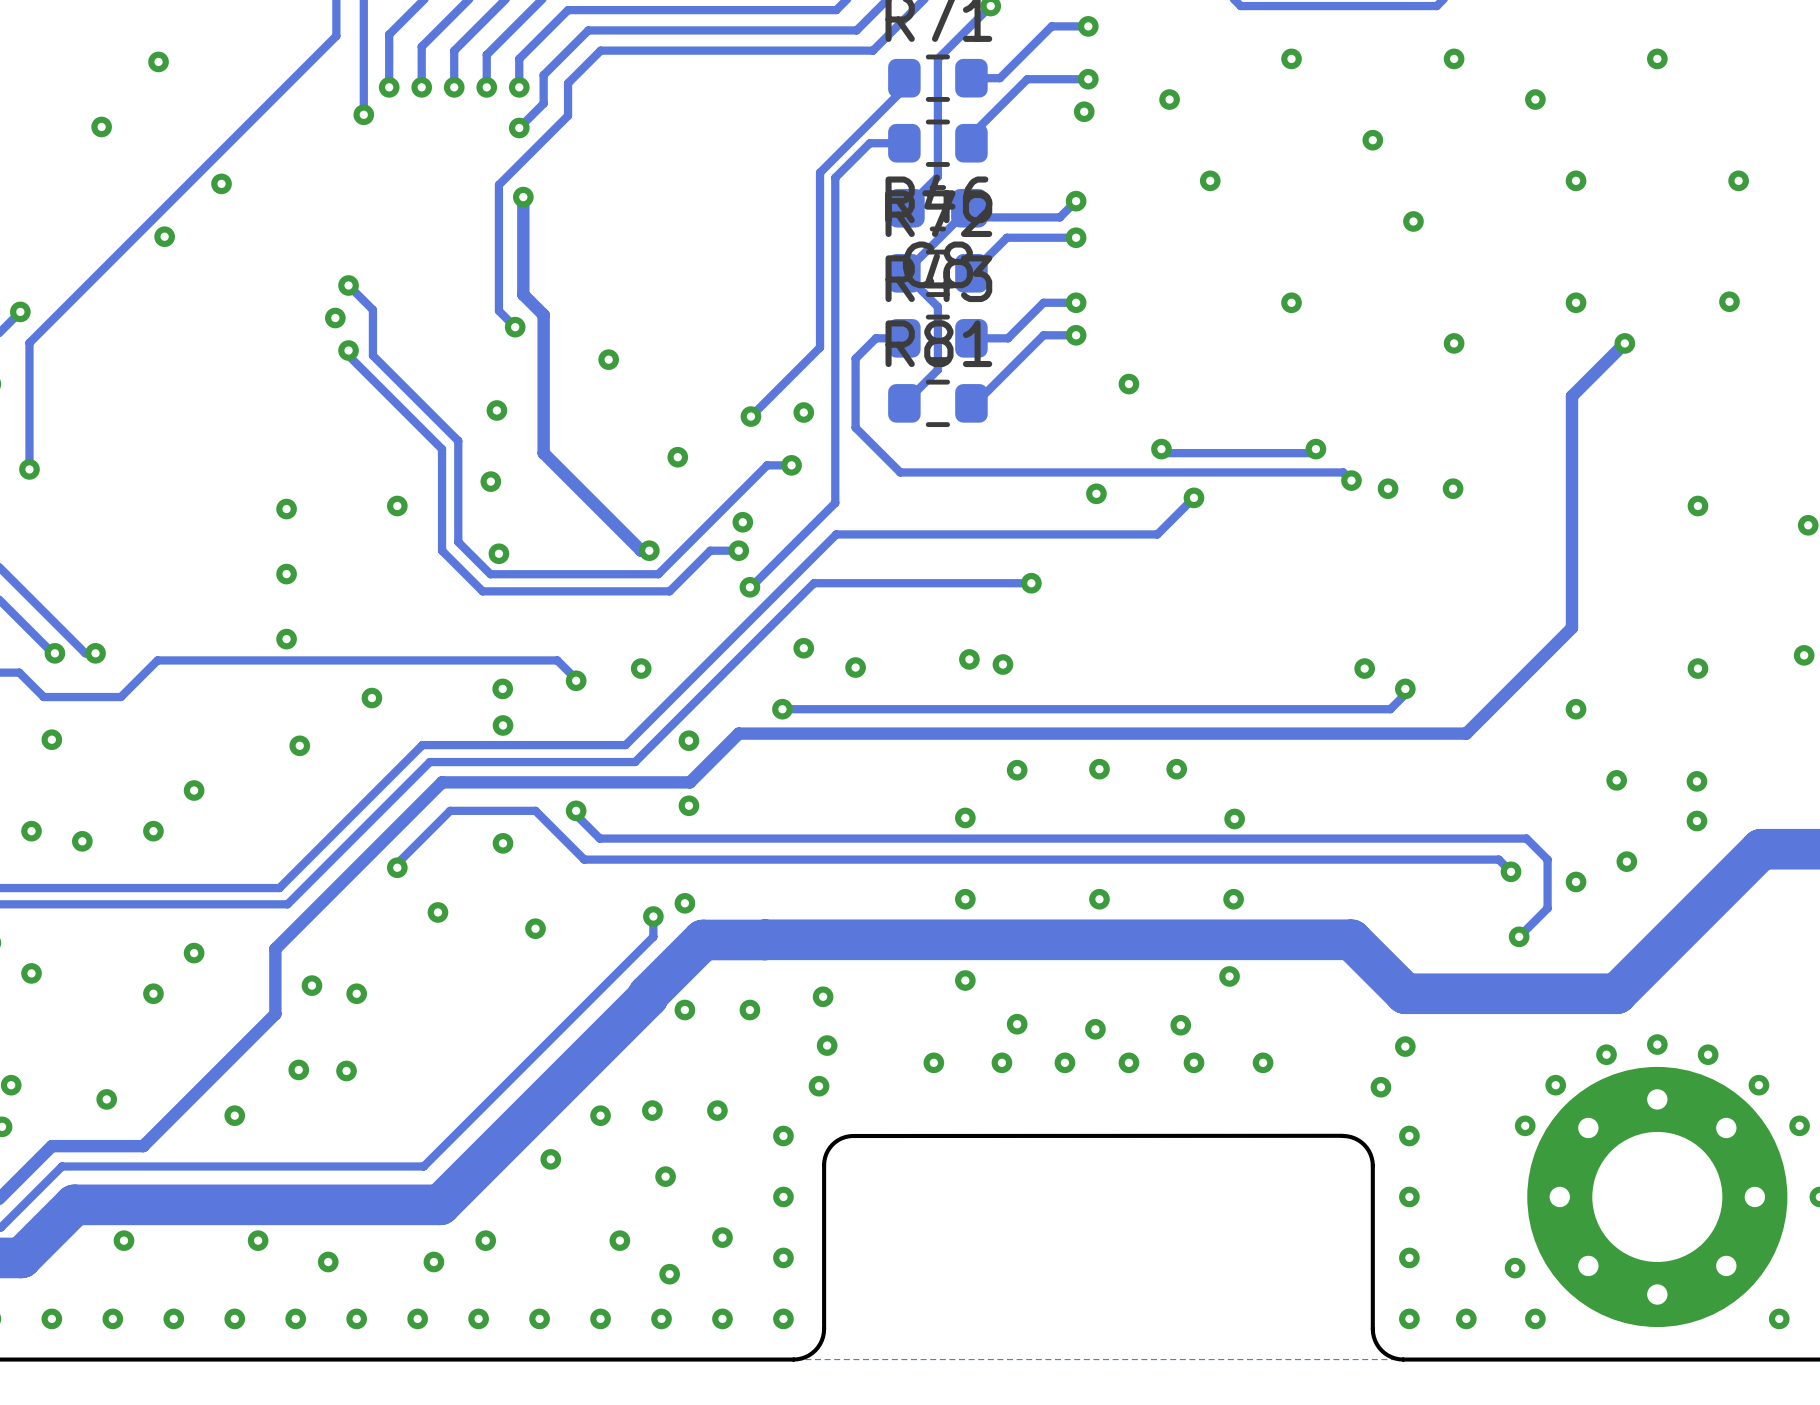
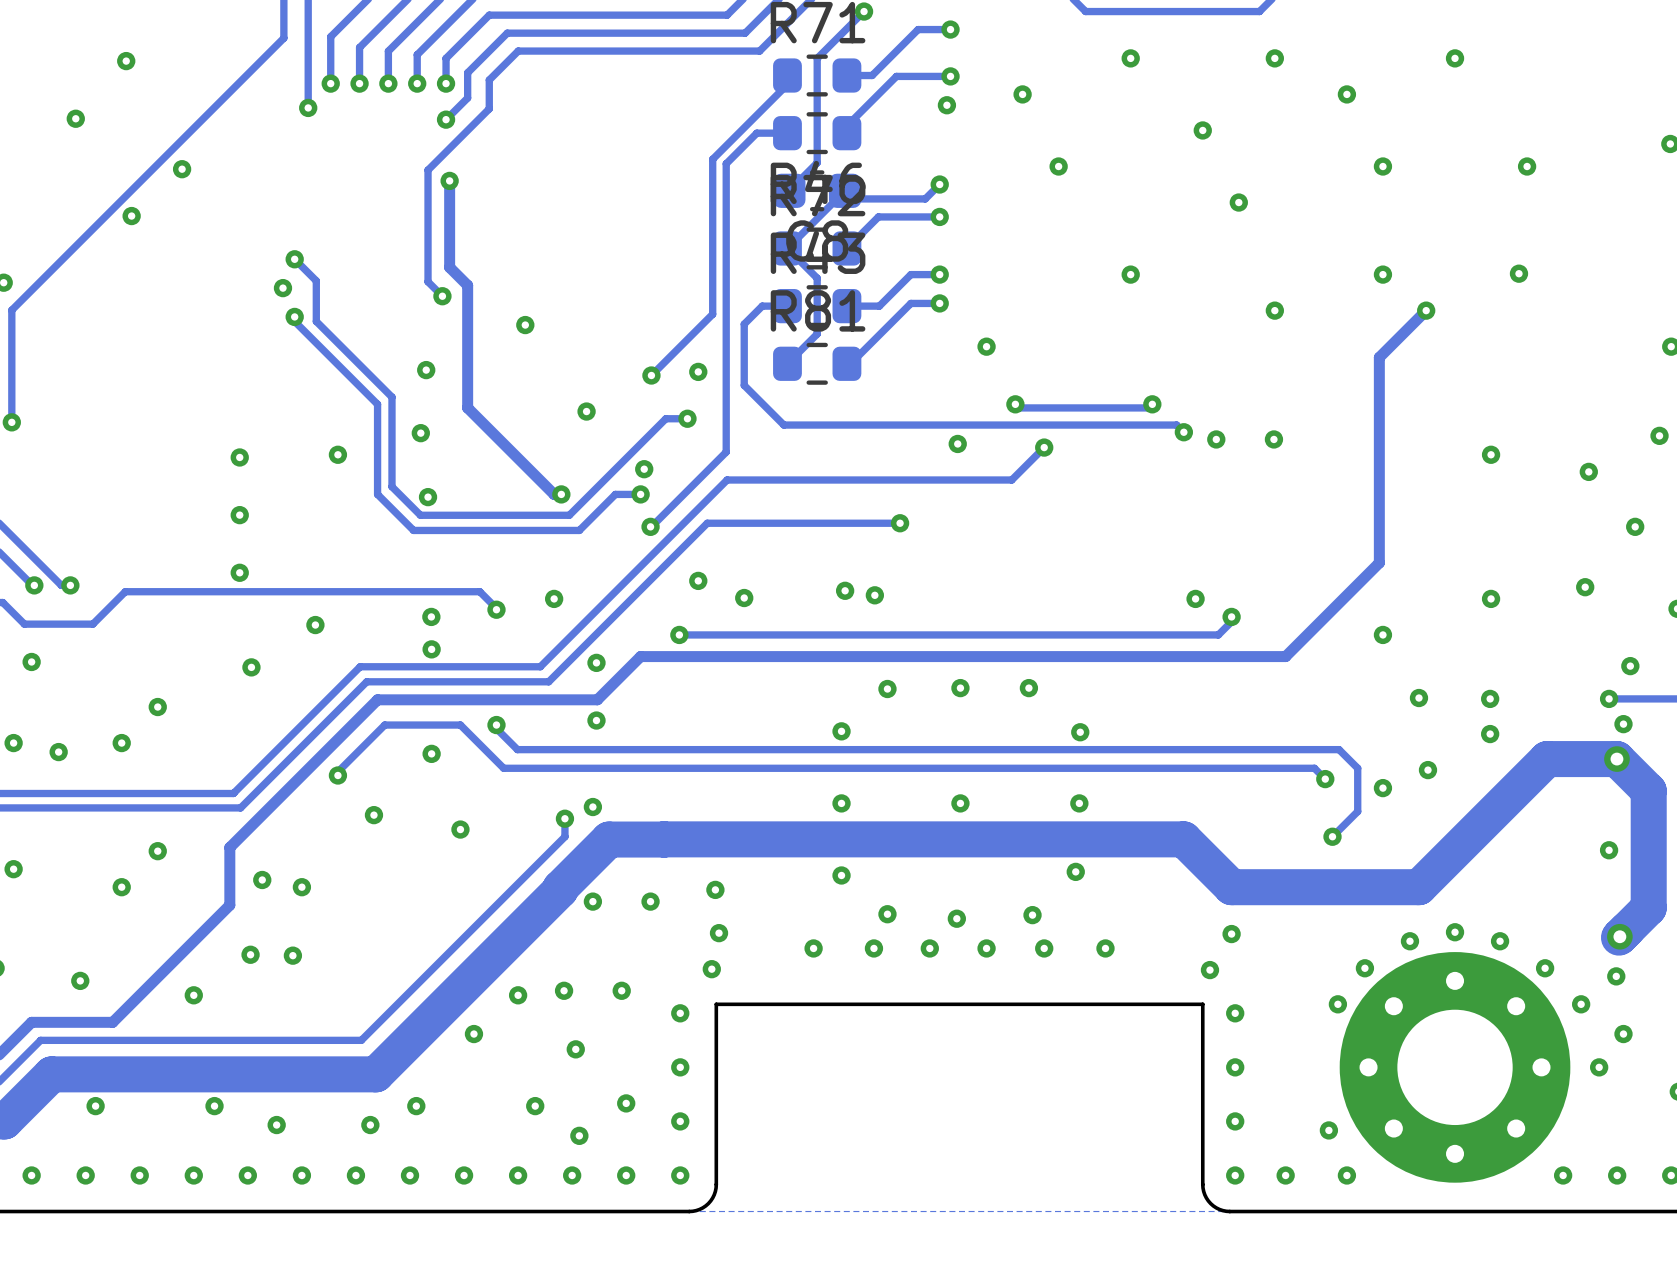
board edge: (824, 1165) (826, 1154) (832, 1144) (841, 1138) (852, 1136) (1343, 1135) (1354, 1138) (1364, 1144) (1370, 1154) (1372, 1165) -> (716, 1039) (716, 1004) (1202, 1004) (1202, 1039)

